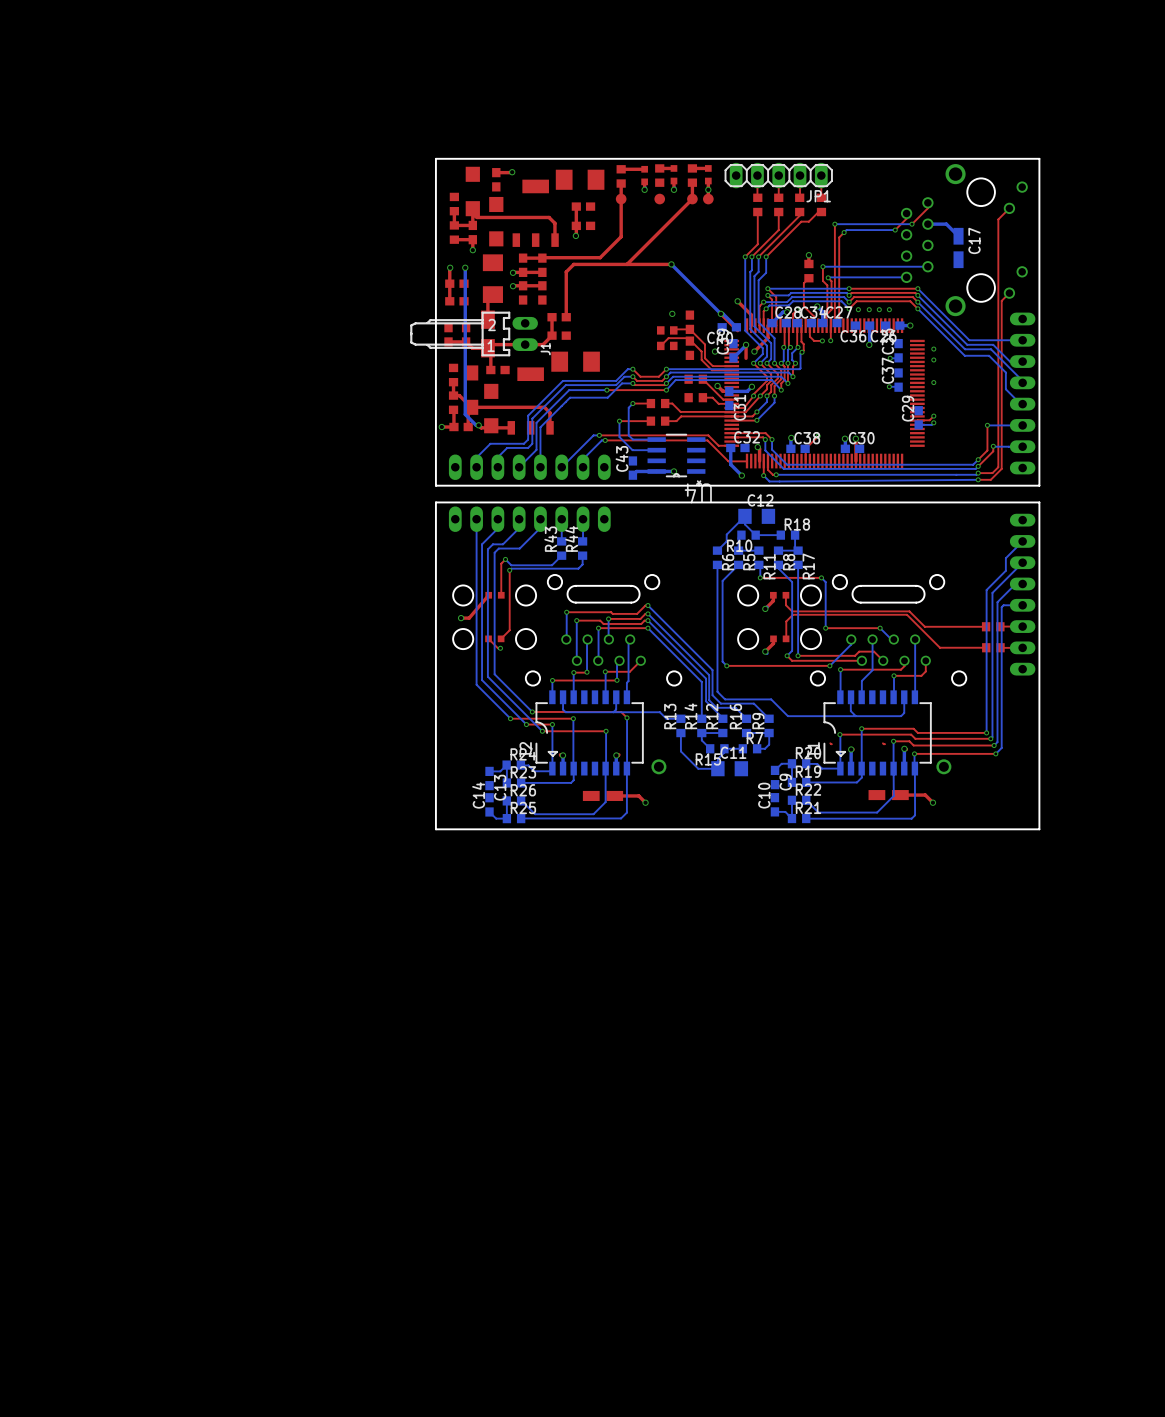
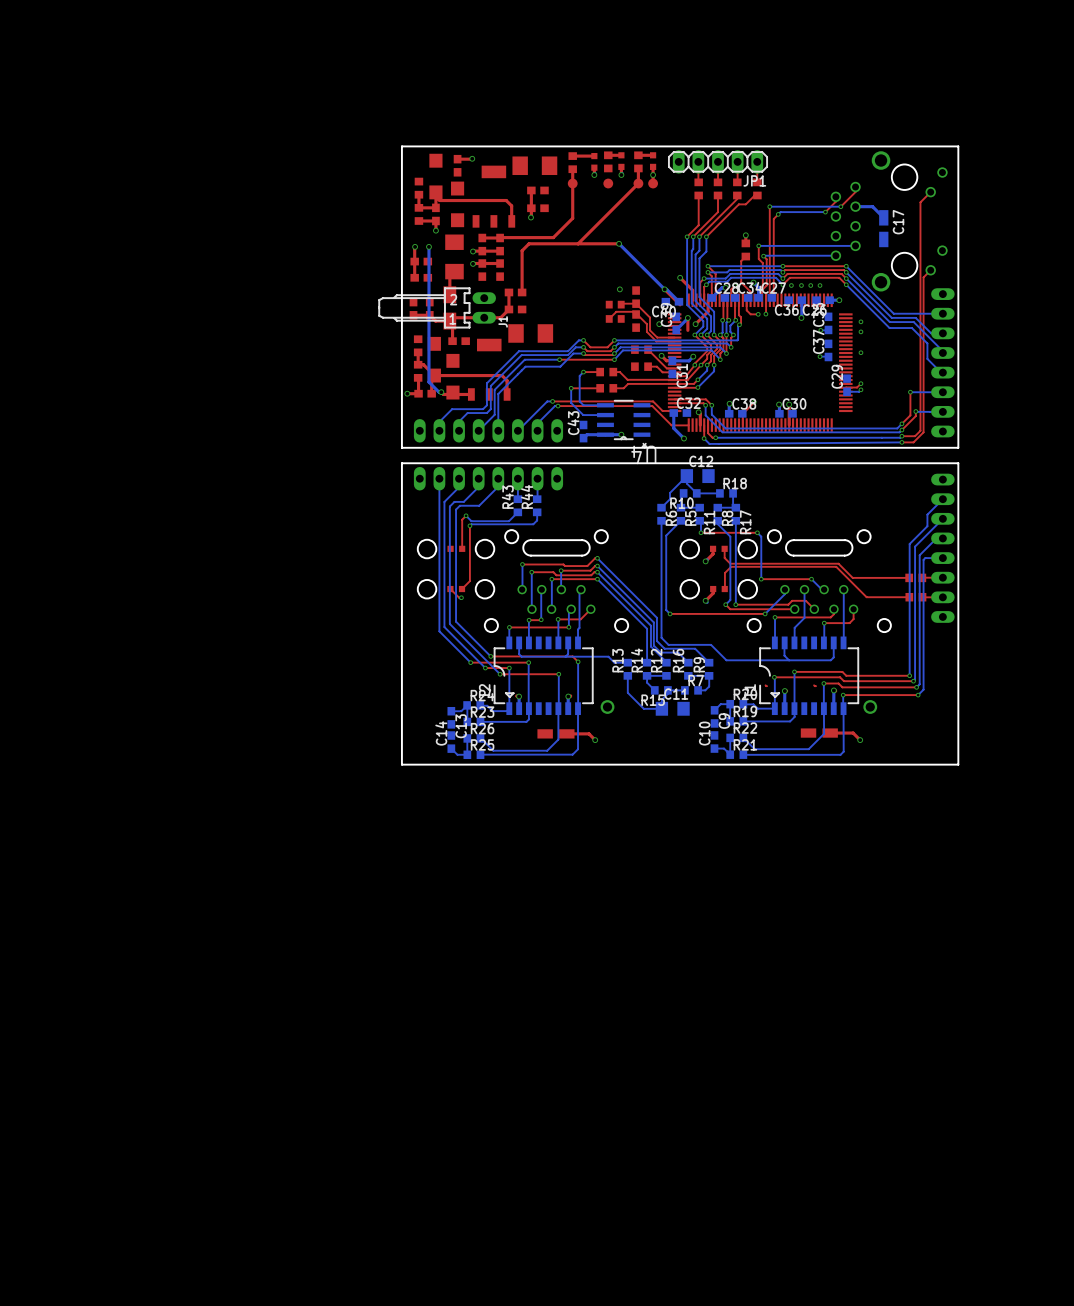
top track: (488, 595) (469, 618) (461, 618) -> none
via: (461, 618) -> none

